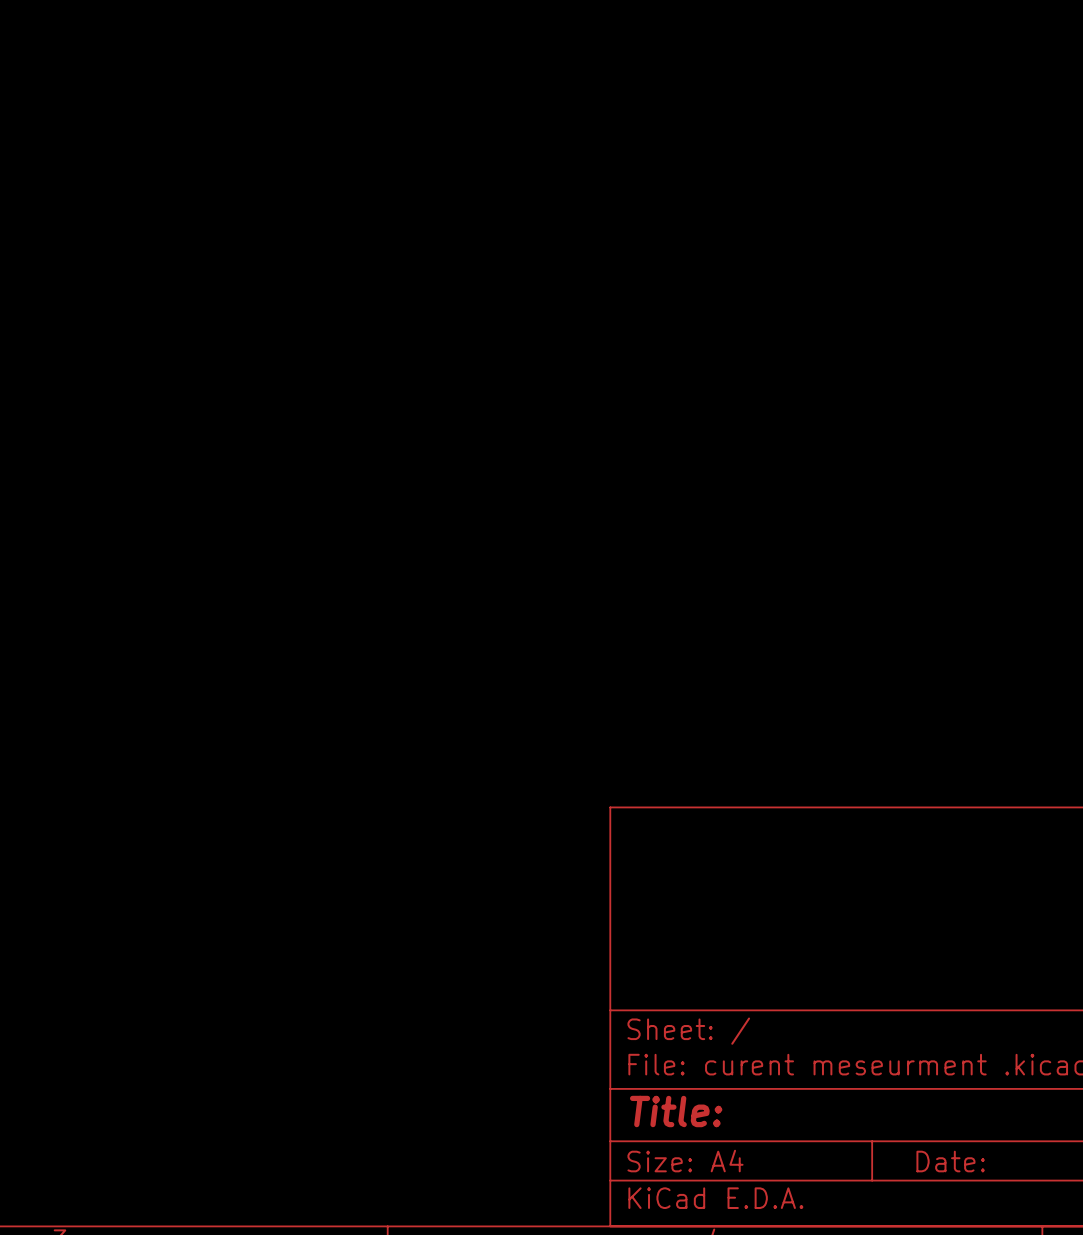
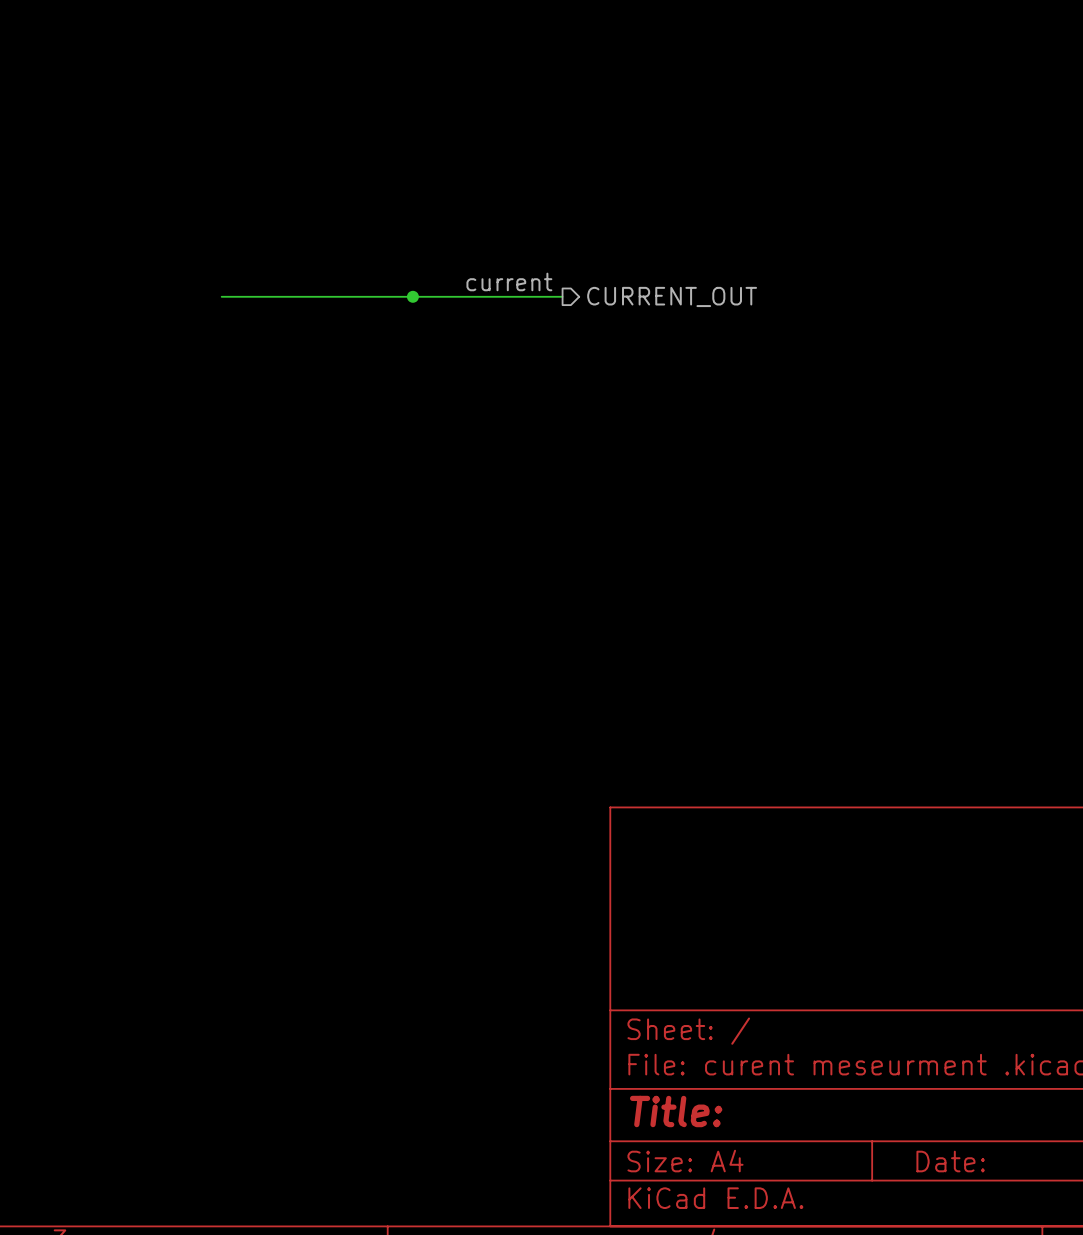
label: none -> current (509, 281)
wire: none -> (221, 296) (562, 296)
junction: none -> (412, 296)
hierarchical label: none -> CURRENT_OUT (672, 296)

